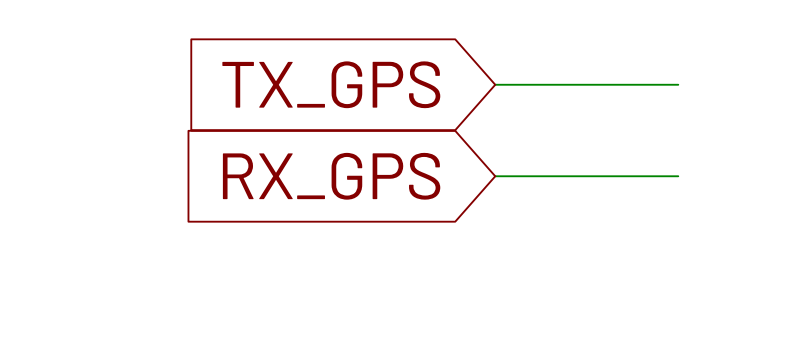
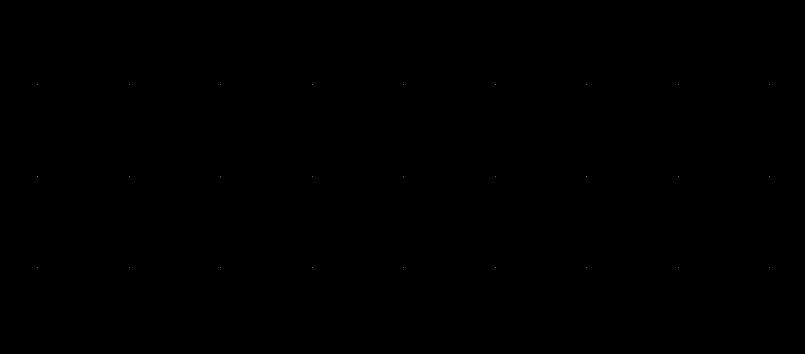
global label: TX_GPS (331, 84) -> none
wire: (495, 84) (678, 84) -> none
global label: RX_GPS (331, 176) -> none
wire: (495, 176) (678, 176) -> none

